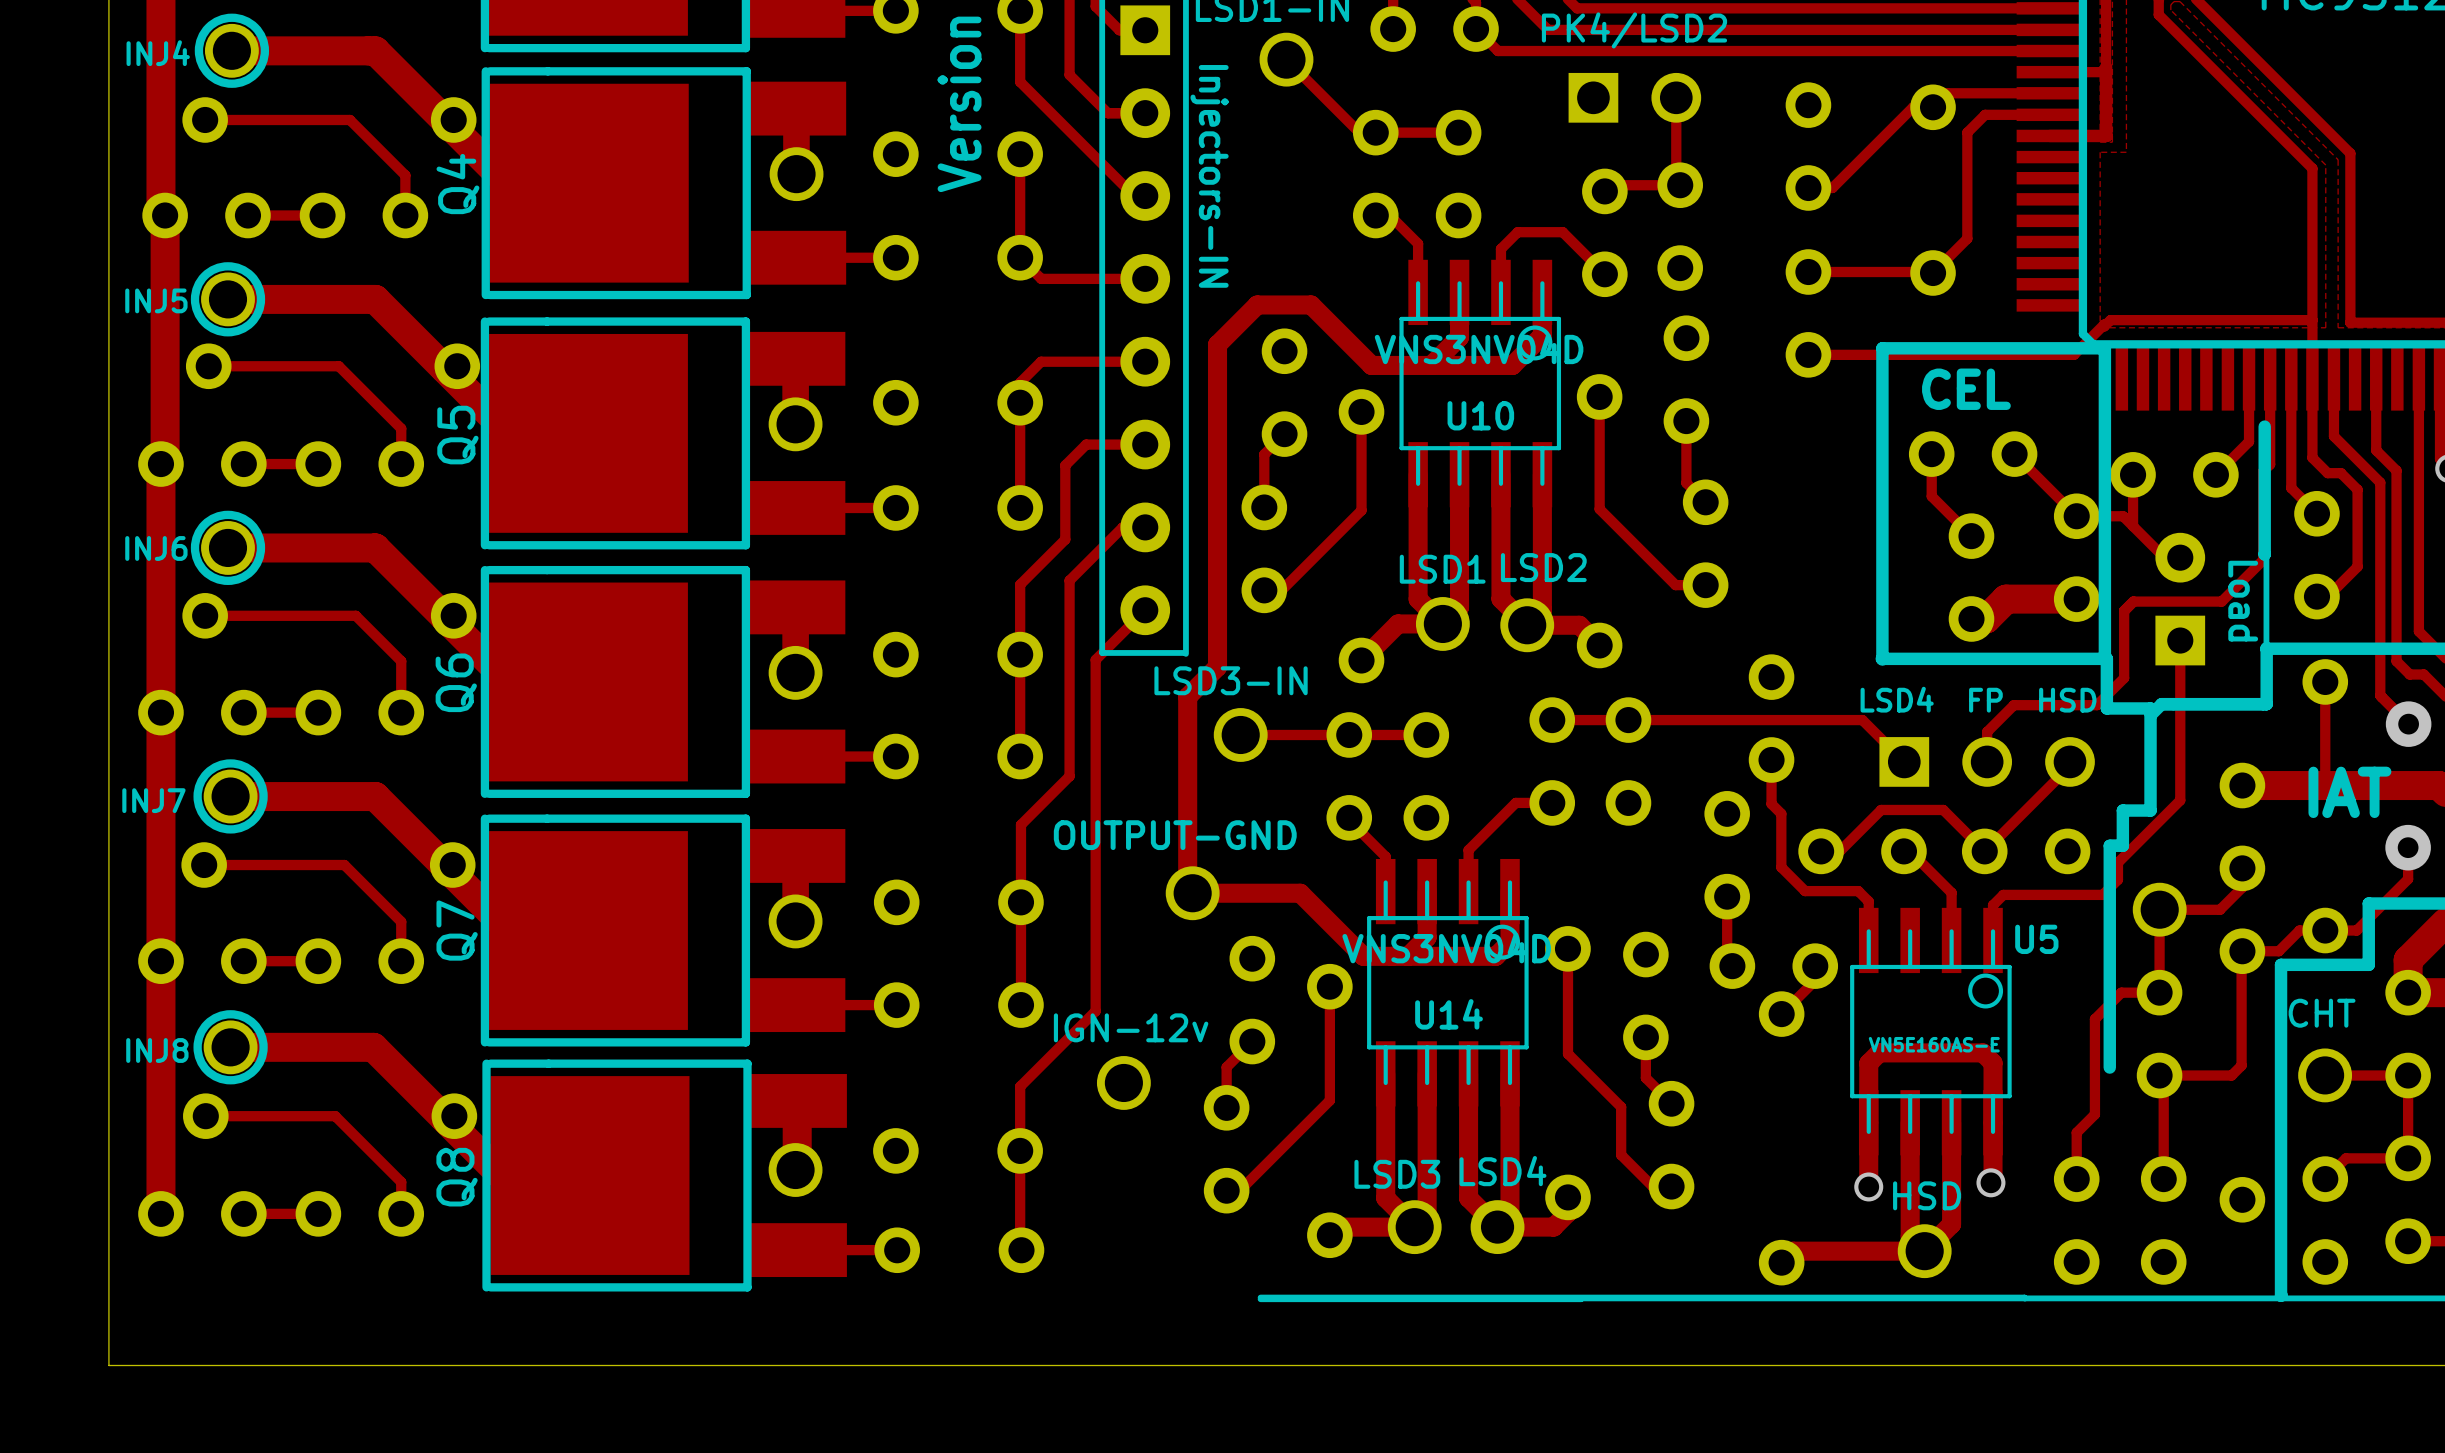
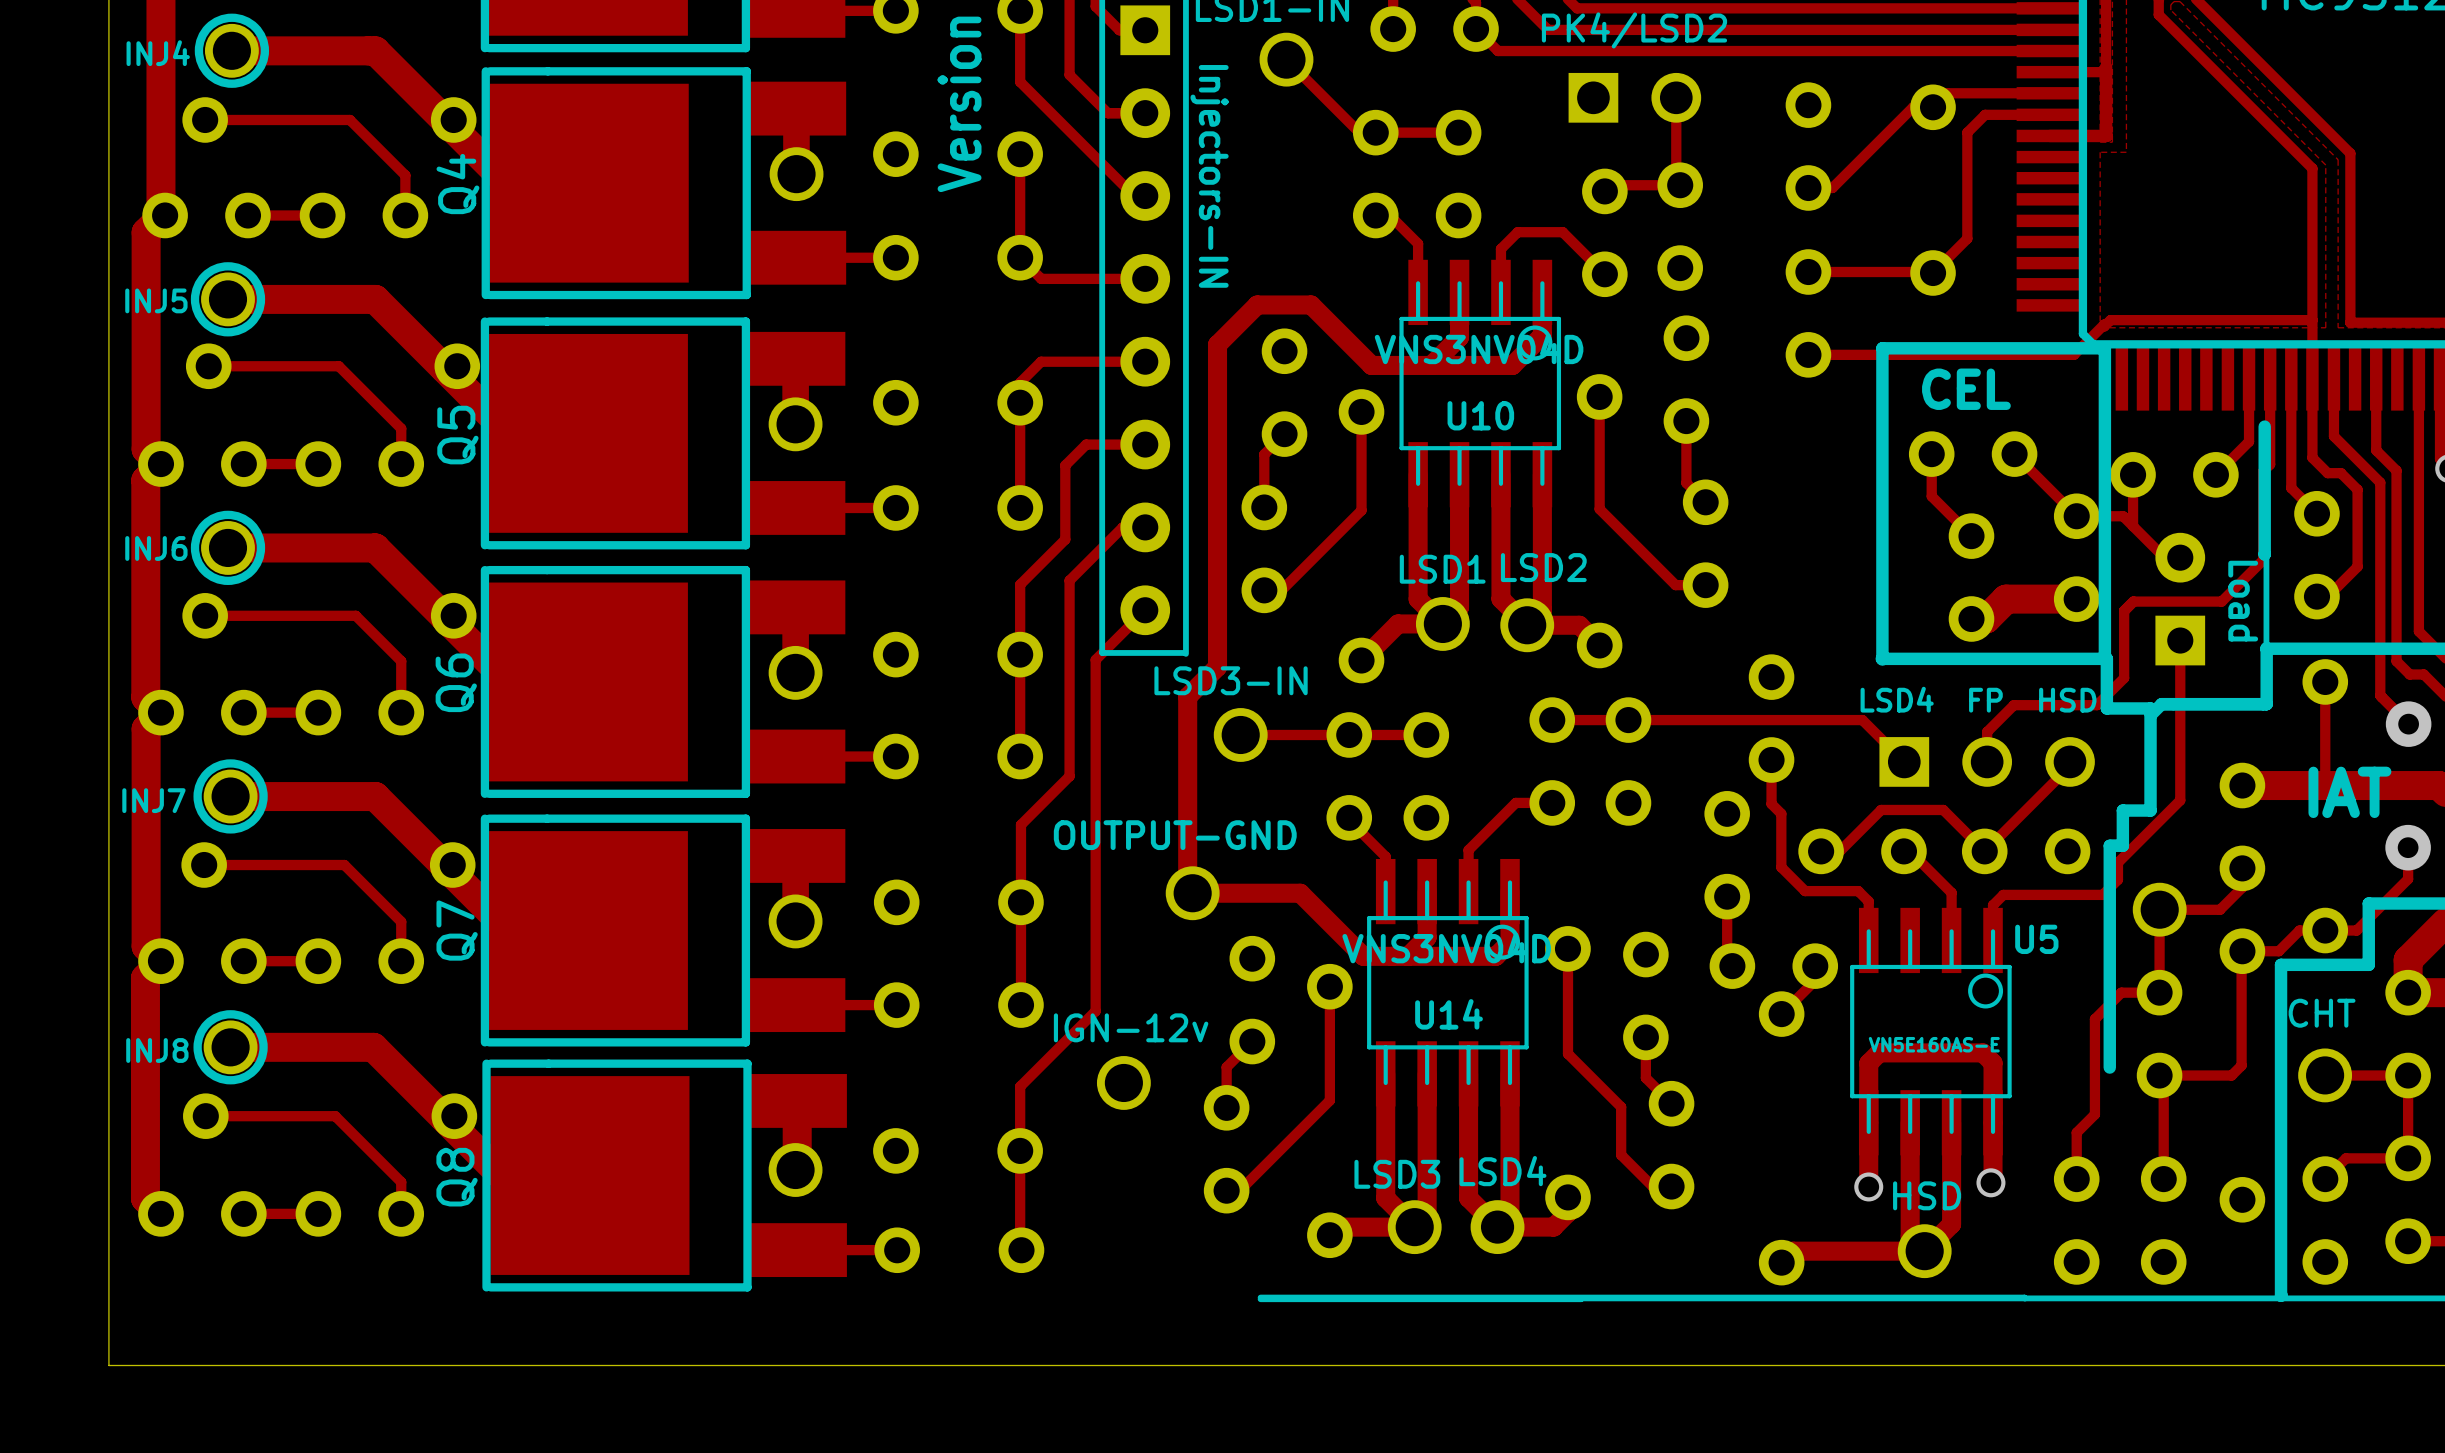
track: (165, 215) (165, 459) (160, 464) -> (165, 215) (146, 232) (146, 449) (160, 464)
track: (160, 465) (160, 712) -> (160, 465) (145, 480) (145, 697) (160, 712)
track: (160, 714) (160, 961) -> (160, 714) (146, 728) (146, 946) (160, 961)
track: (160, 962) (160, 1213) -> (160, 962) (145, 978) (145, 1198) (160, 1213)

